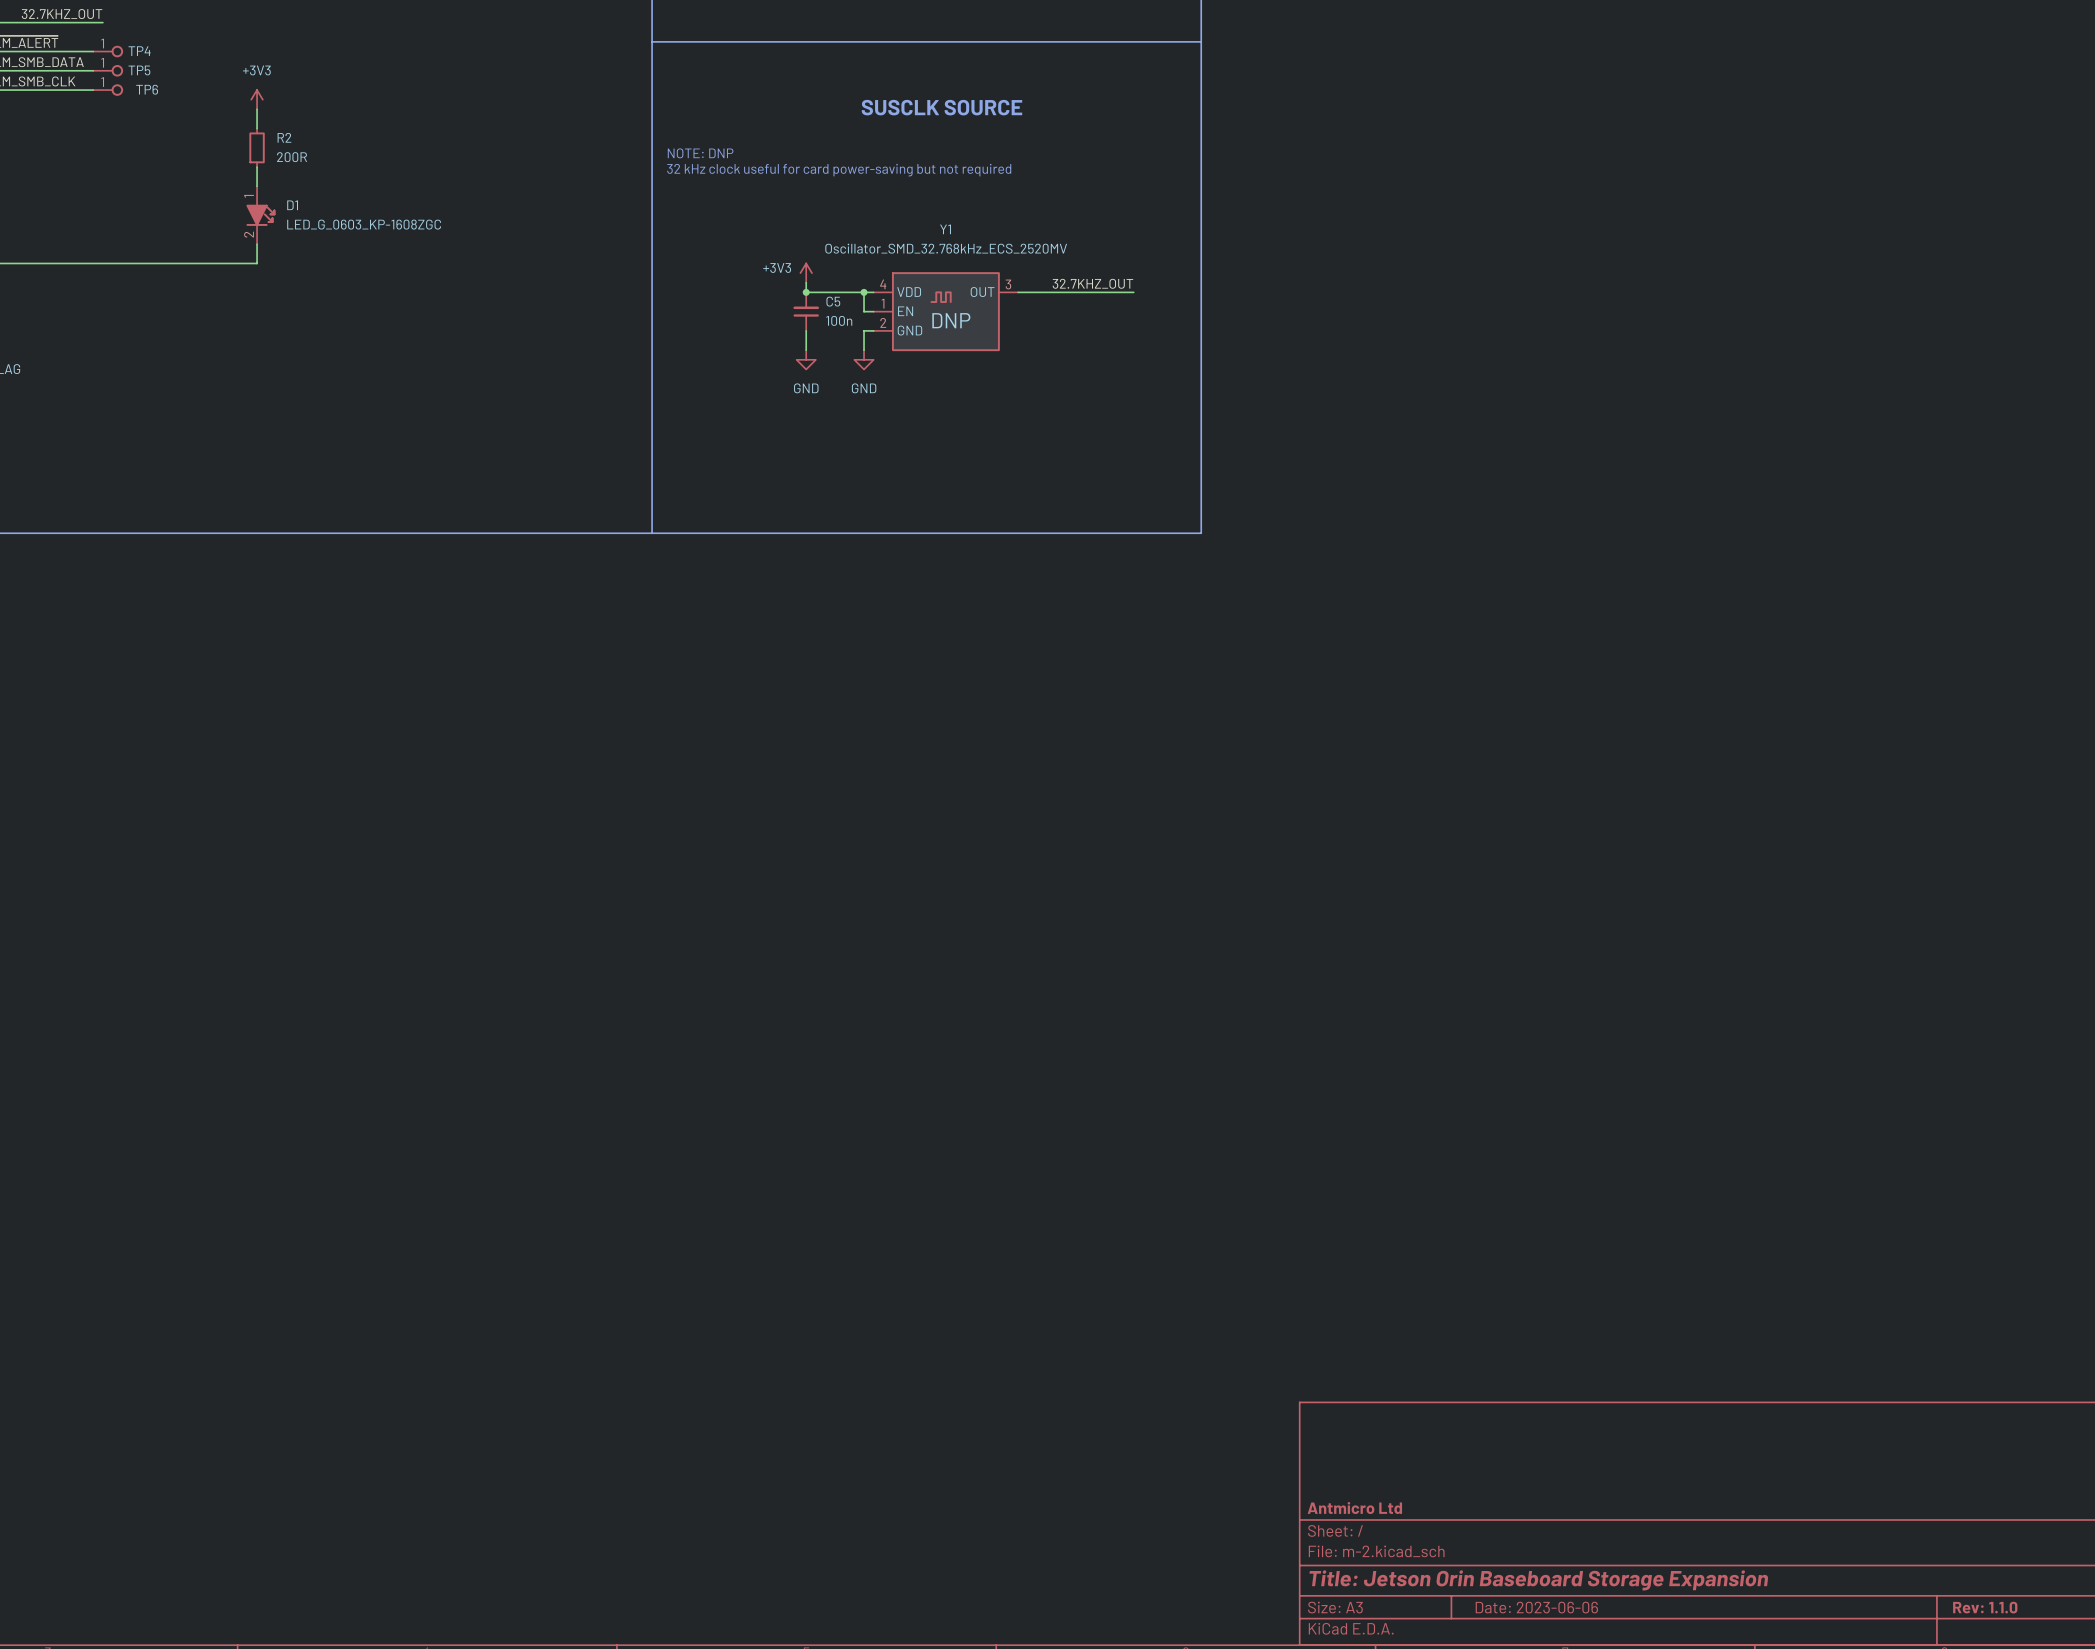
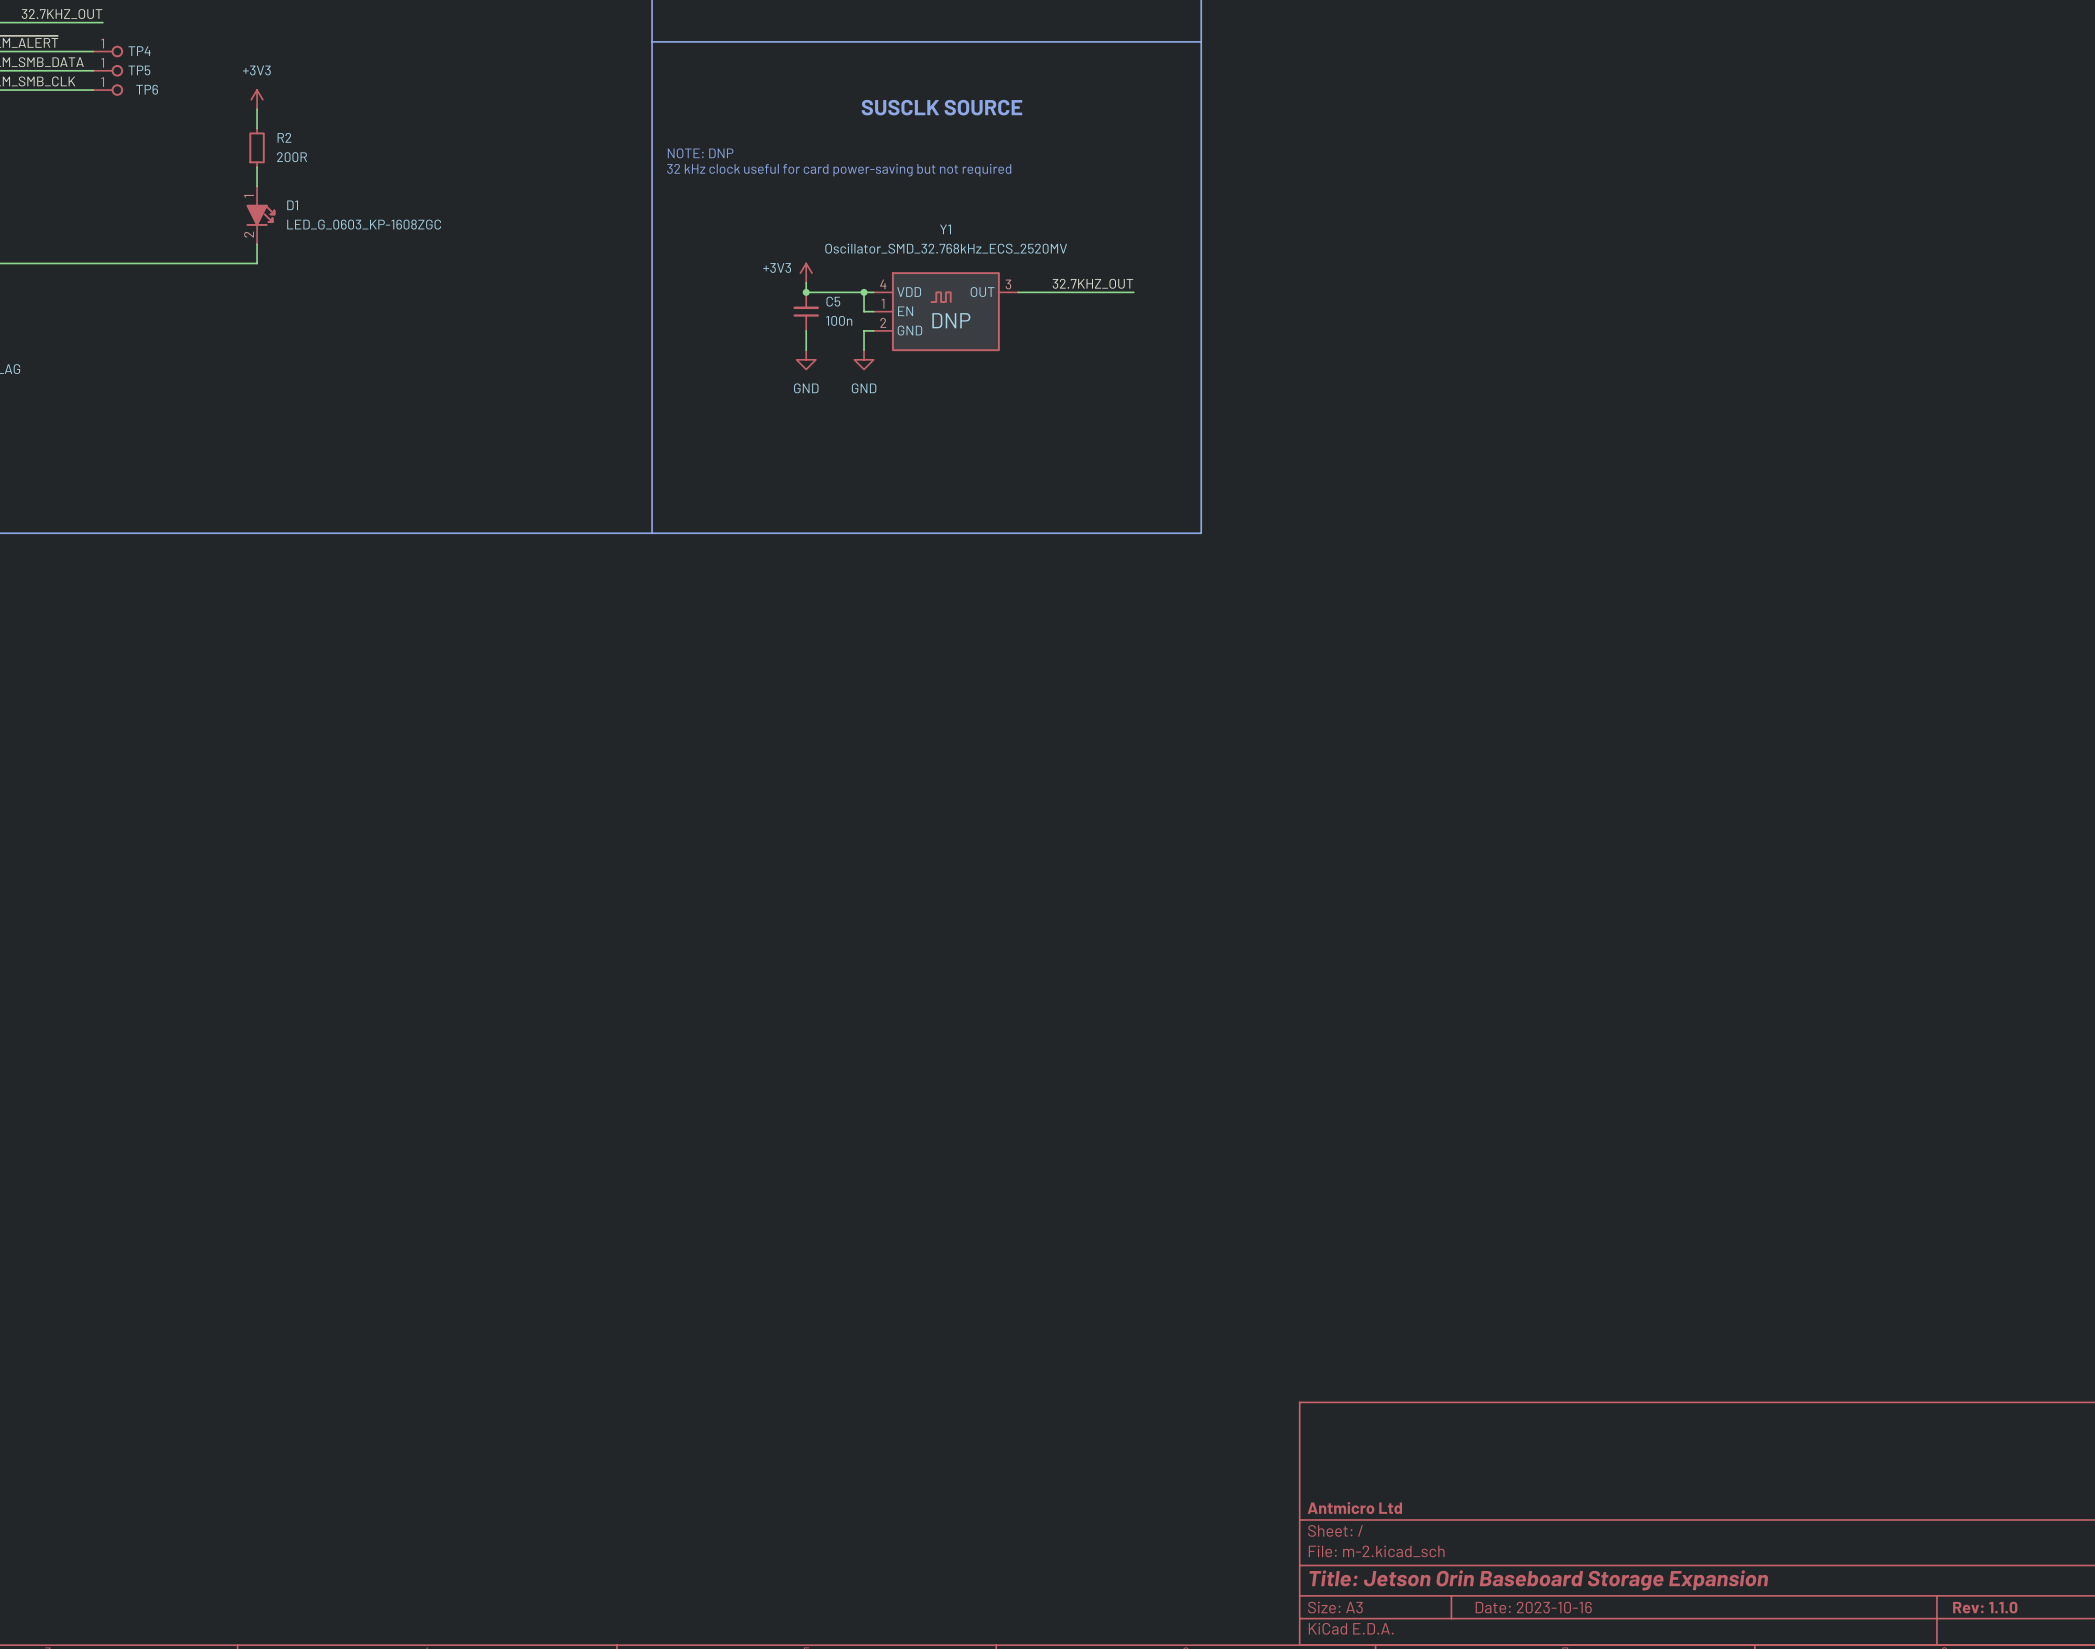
title block: Date: 2023-06-06 (1536, 1607) -> Date: 2023-10-16 (1533, 1607)

